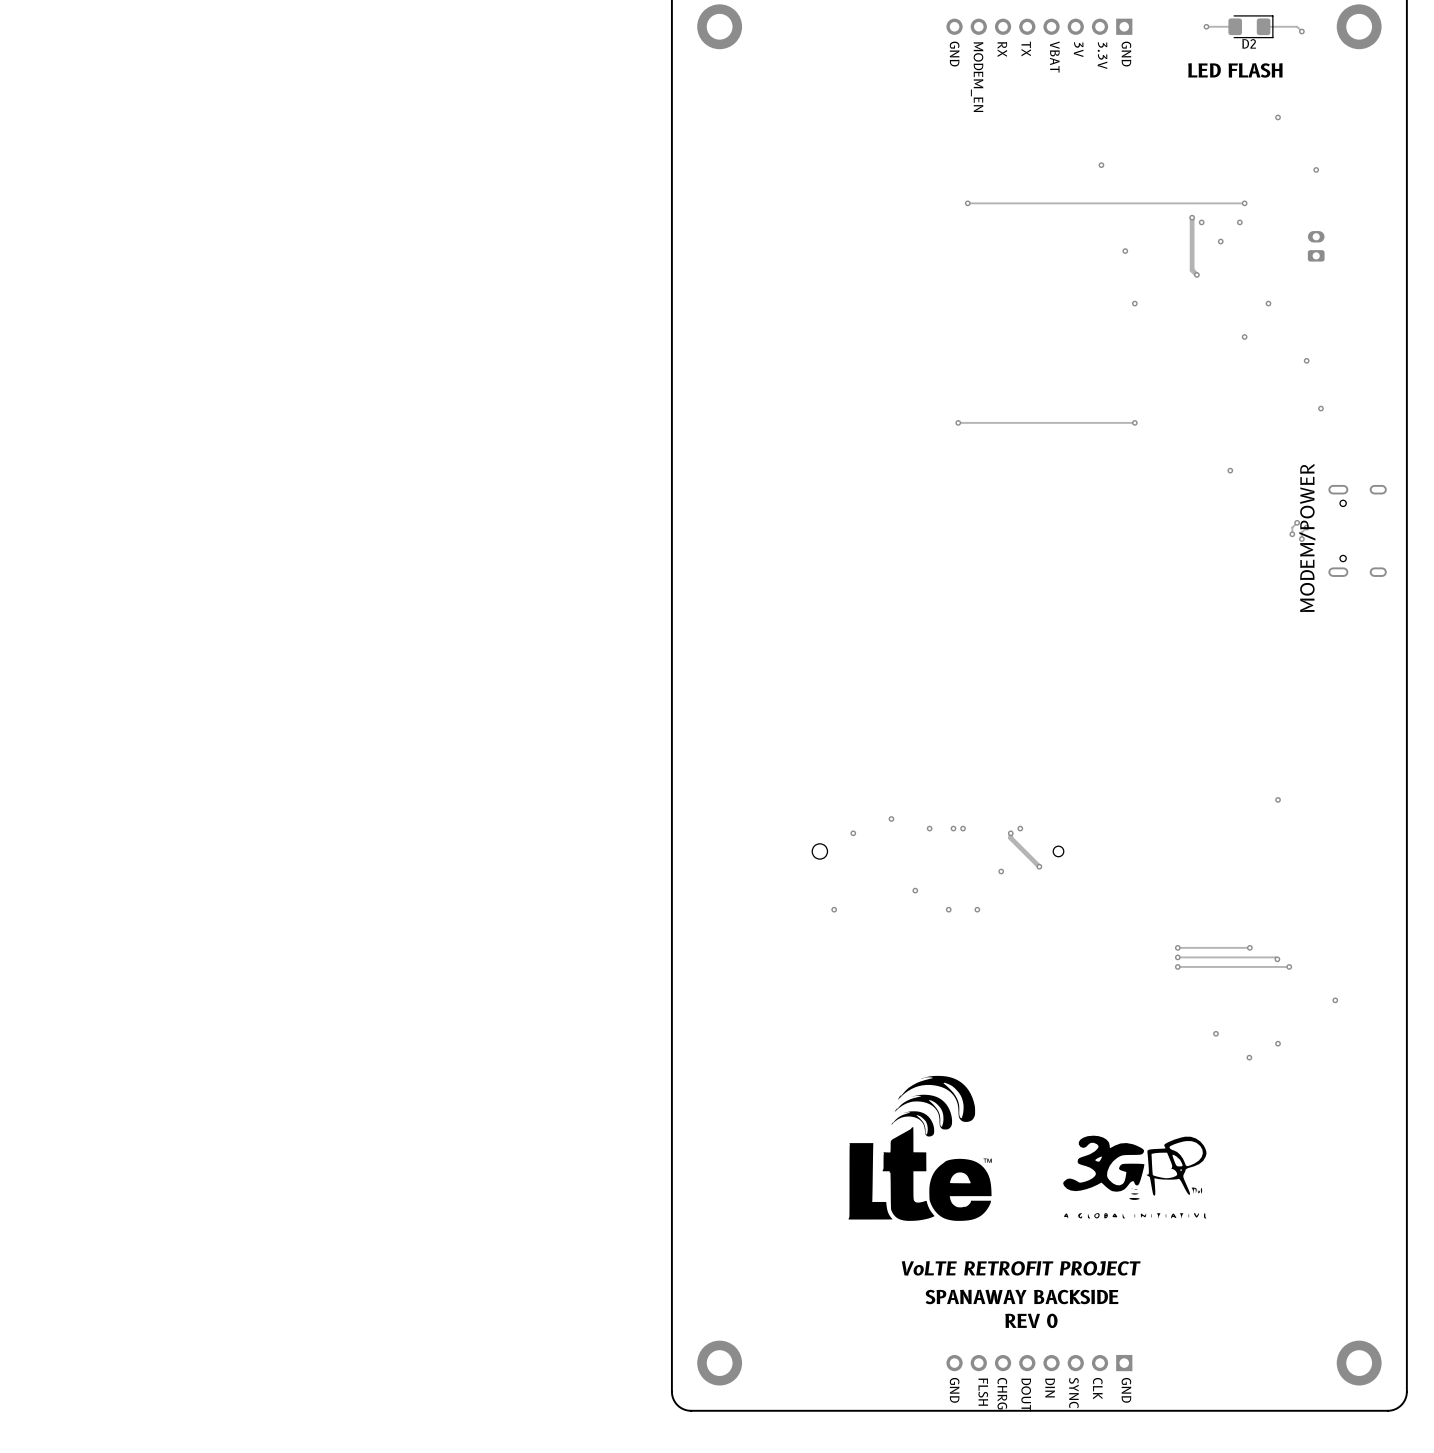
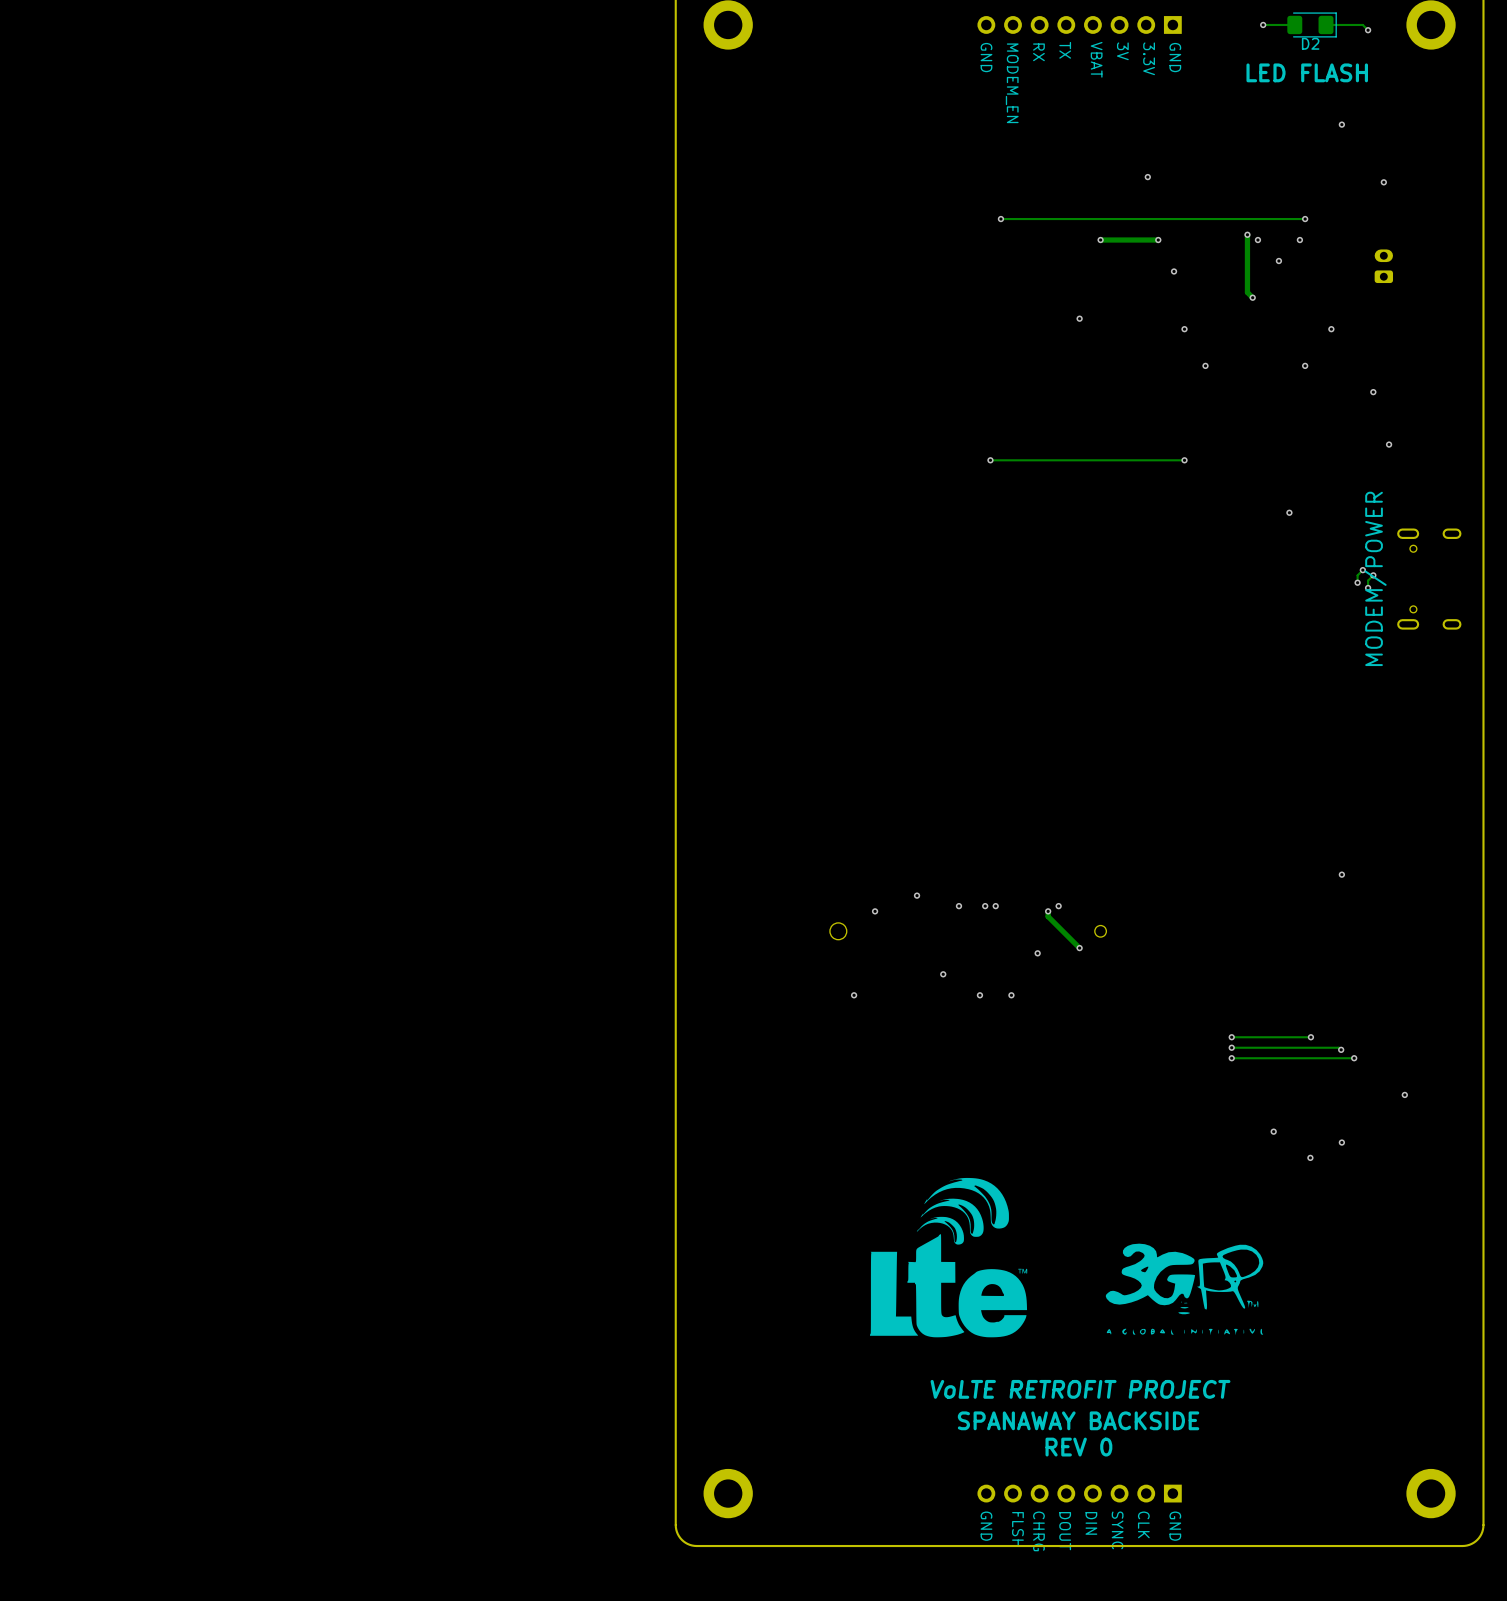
via: none -> (1100, 240)
track: none -> (1158, 240) (1100, 240)
via: none -> (1158, 240)
via: none -> (1079, 318)
via: none -> (1205, 365)

